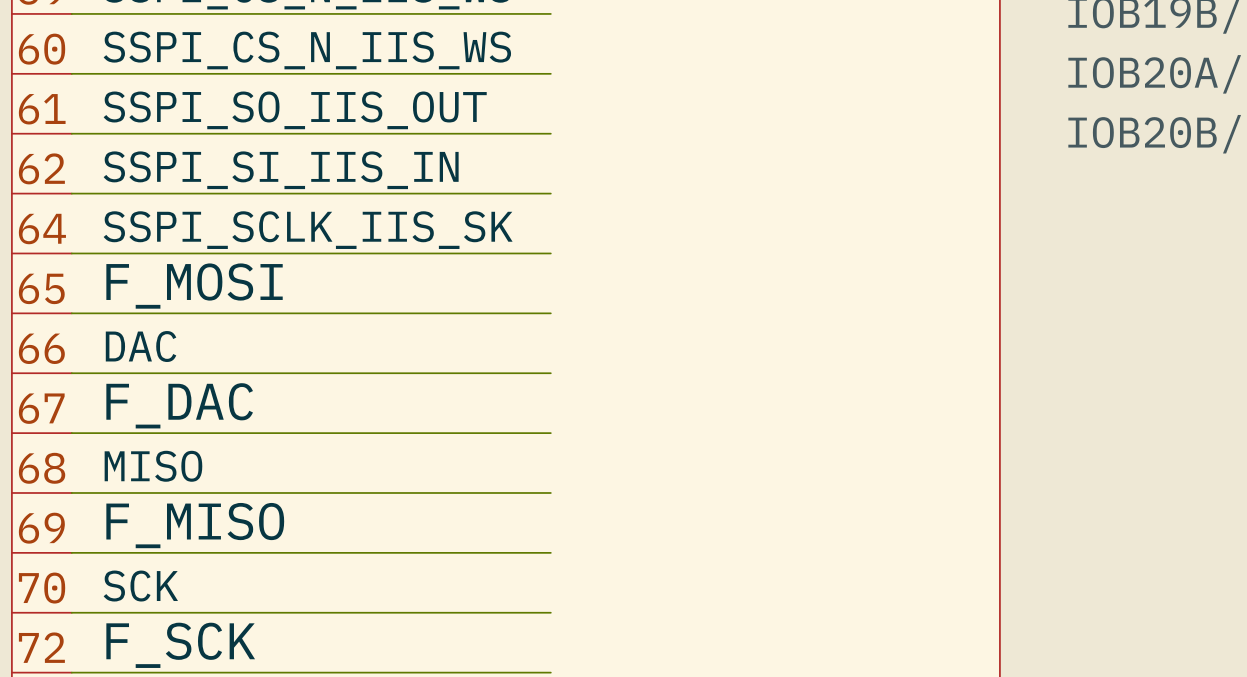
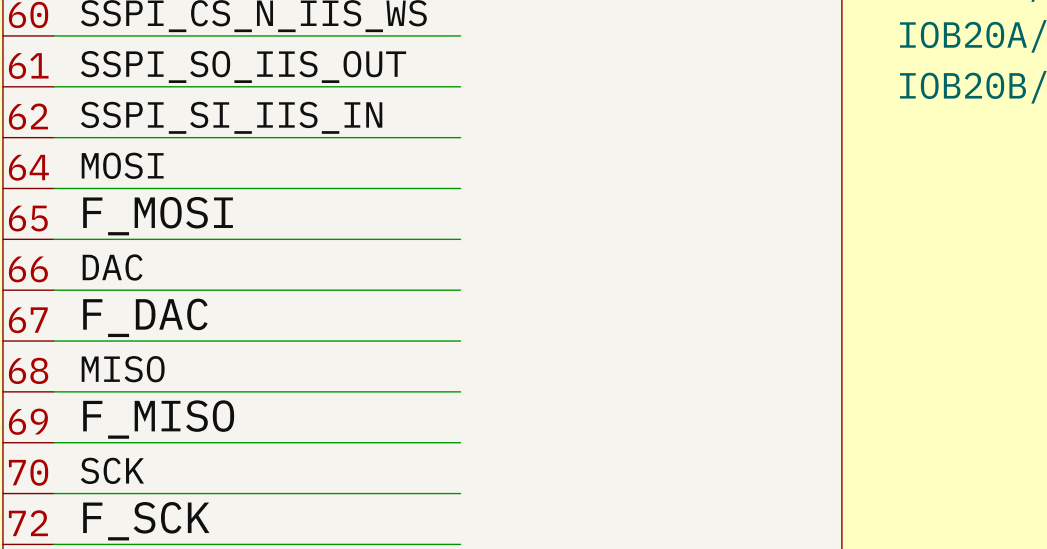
label: SSPI_SCLK_IIS_SK (308, 230) -> MOSI (122, 165)

